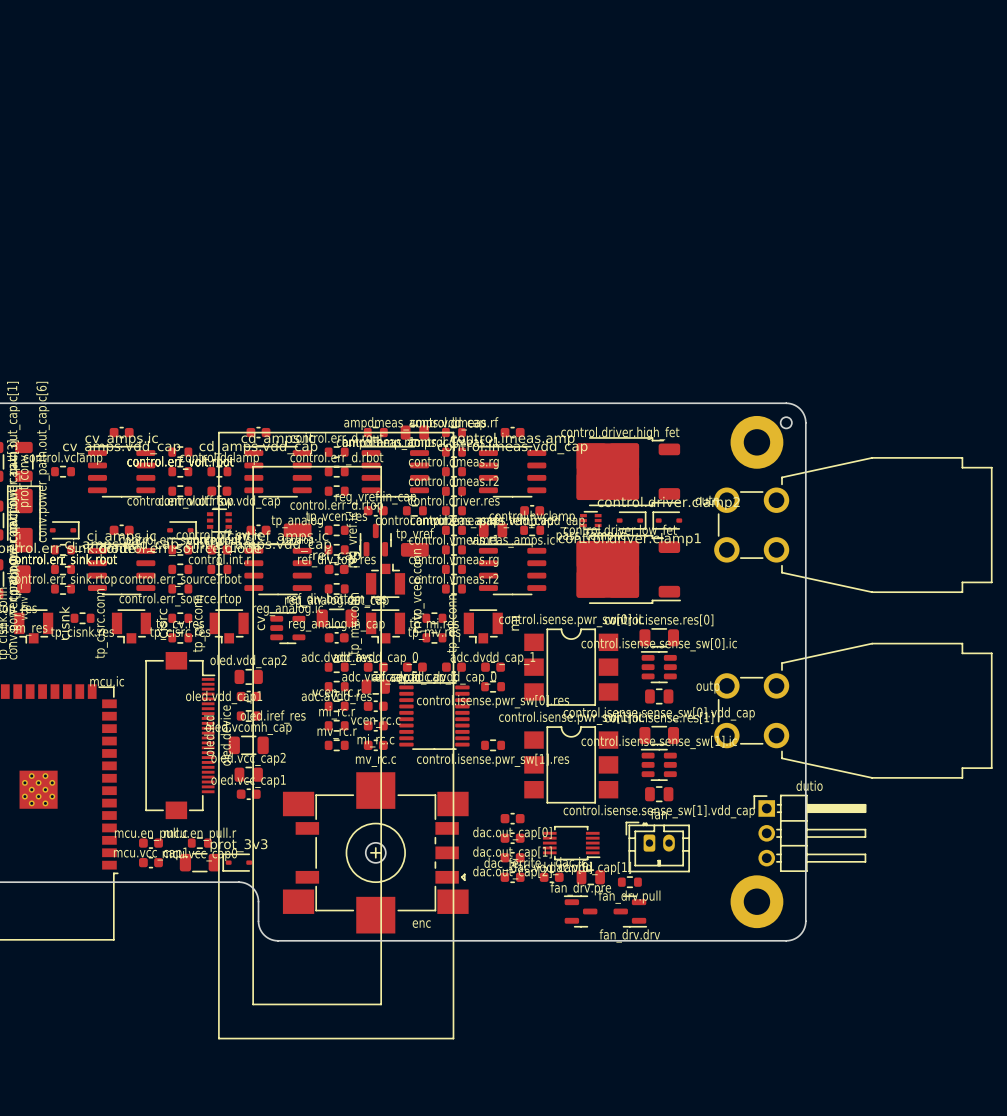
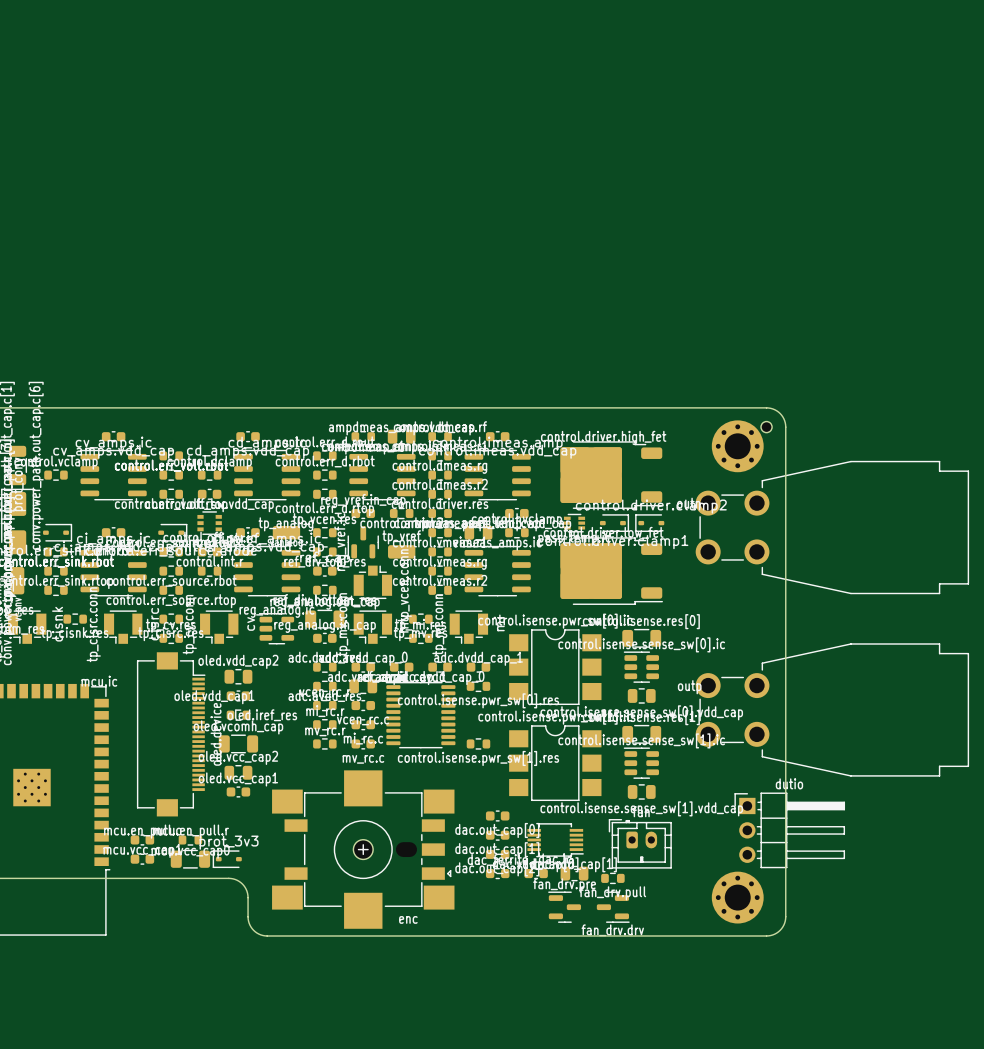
part footprint: [730, 415, 784, 469] -> [711, 420, 764, 473]
oled.lcd: (336, 735) -> none
part footprint: [730, 875, 784, 929] -> [711, 871, 764, 924]

